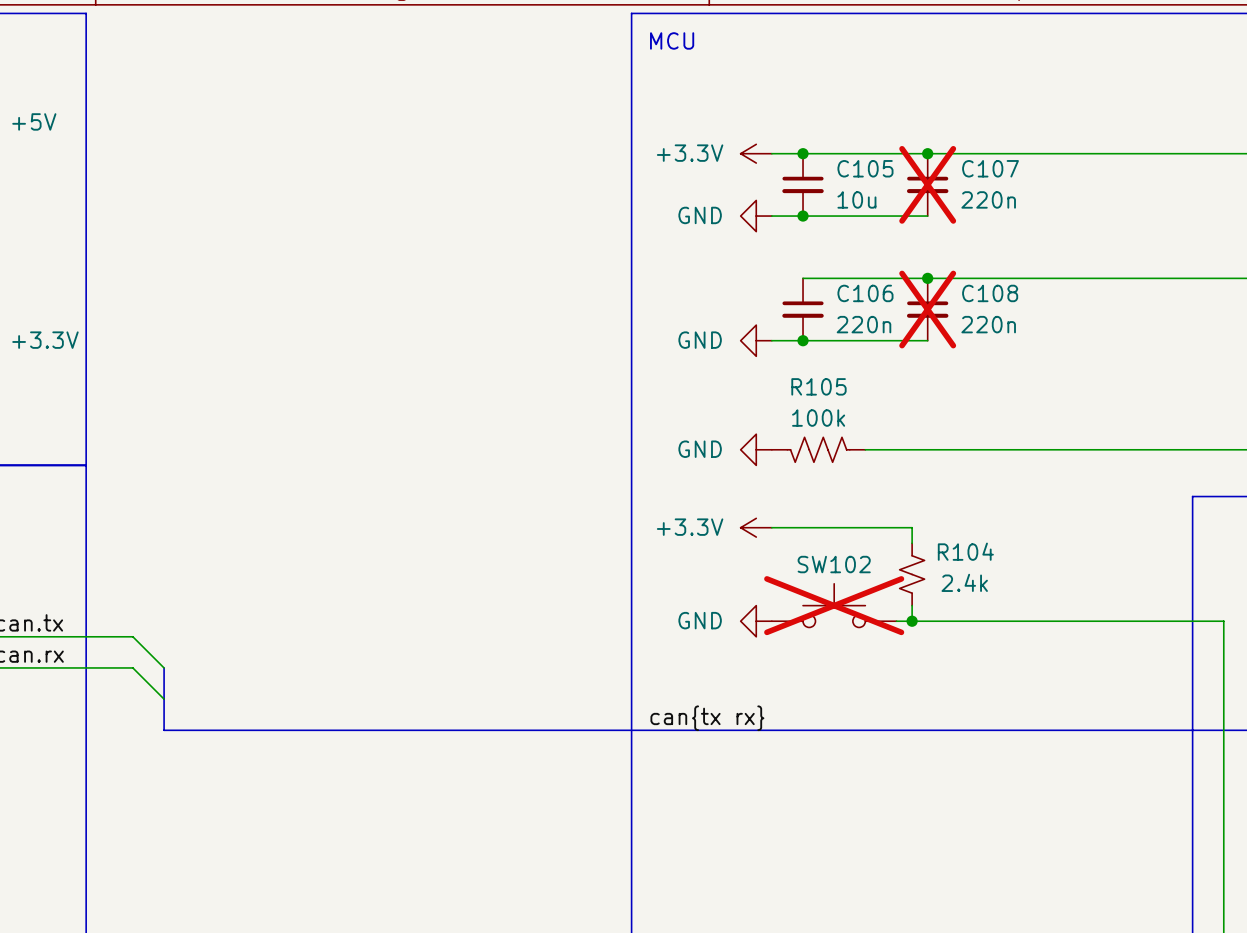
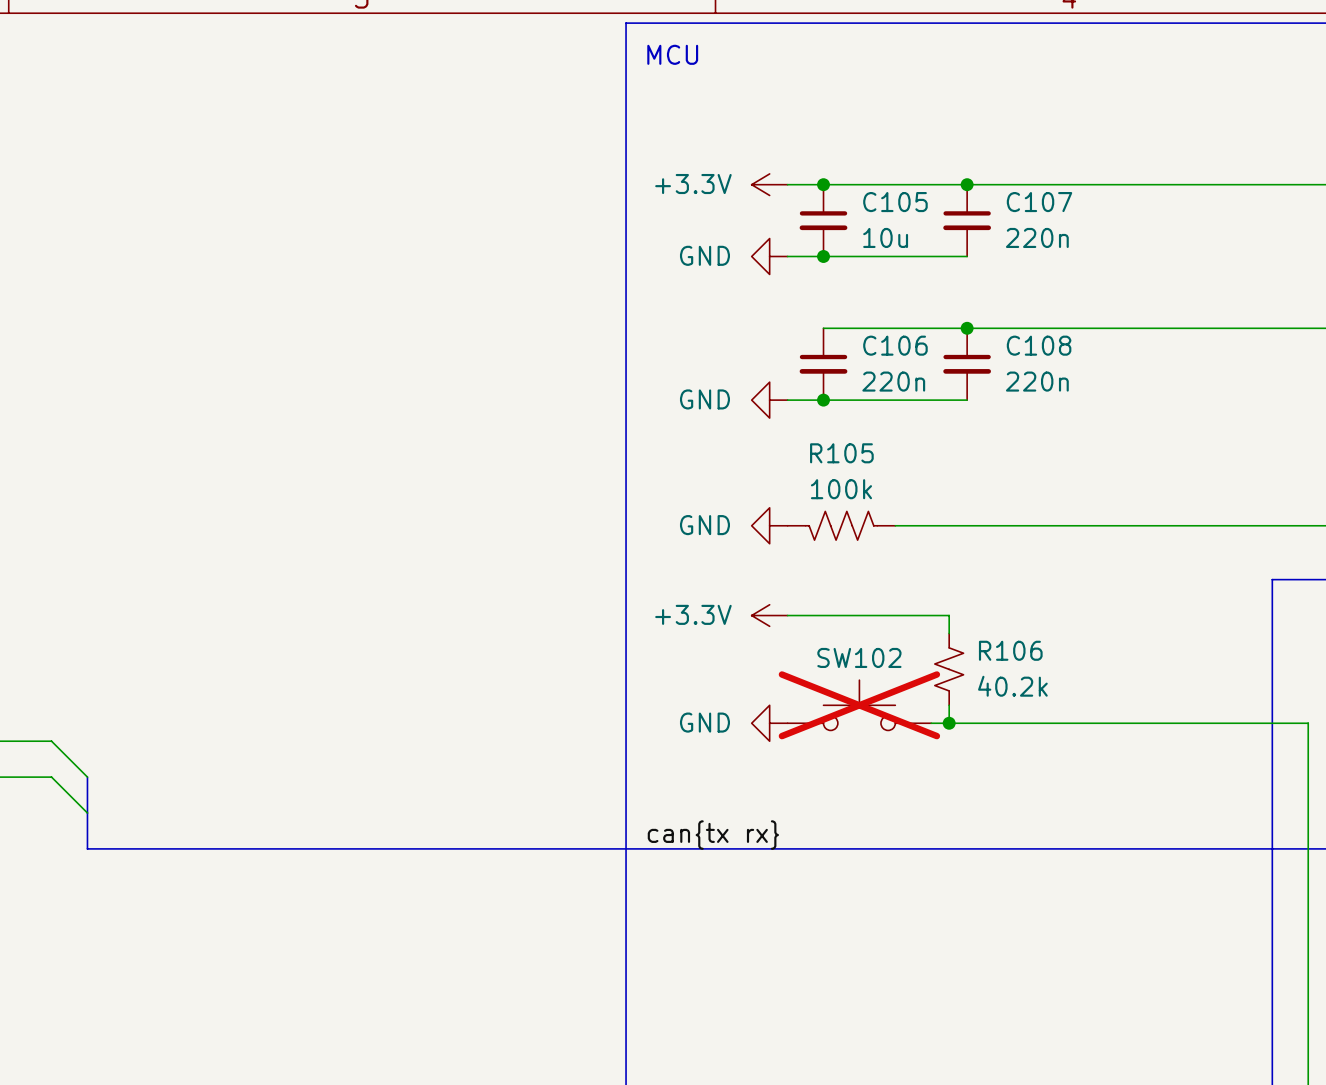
C107 do-not-place cross: (927, 184) -> none
C108 do-not-place cross: (927, 309) -> none
R104 name: R104 (965, 551) -> R106 (1010, 650)
R104 value: 2.4k (964, 582) -> 40.2k (1012, 686)

